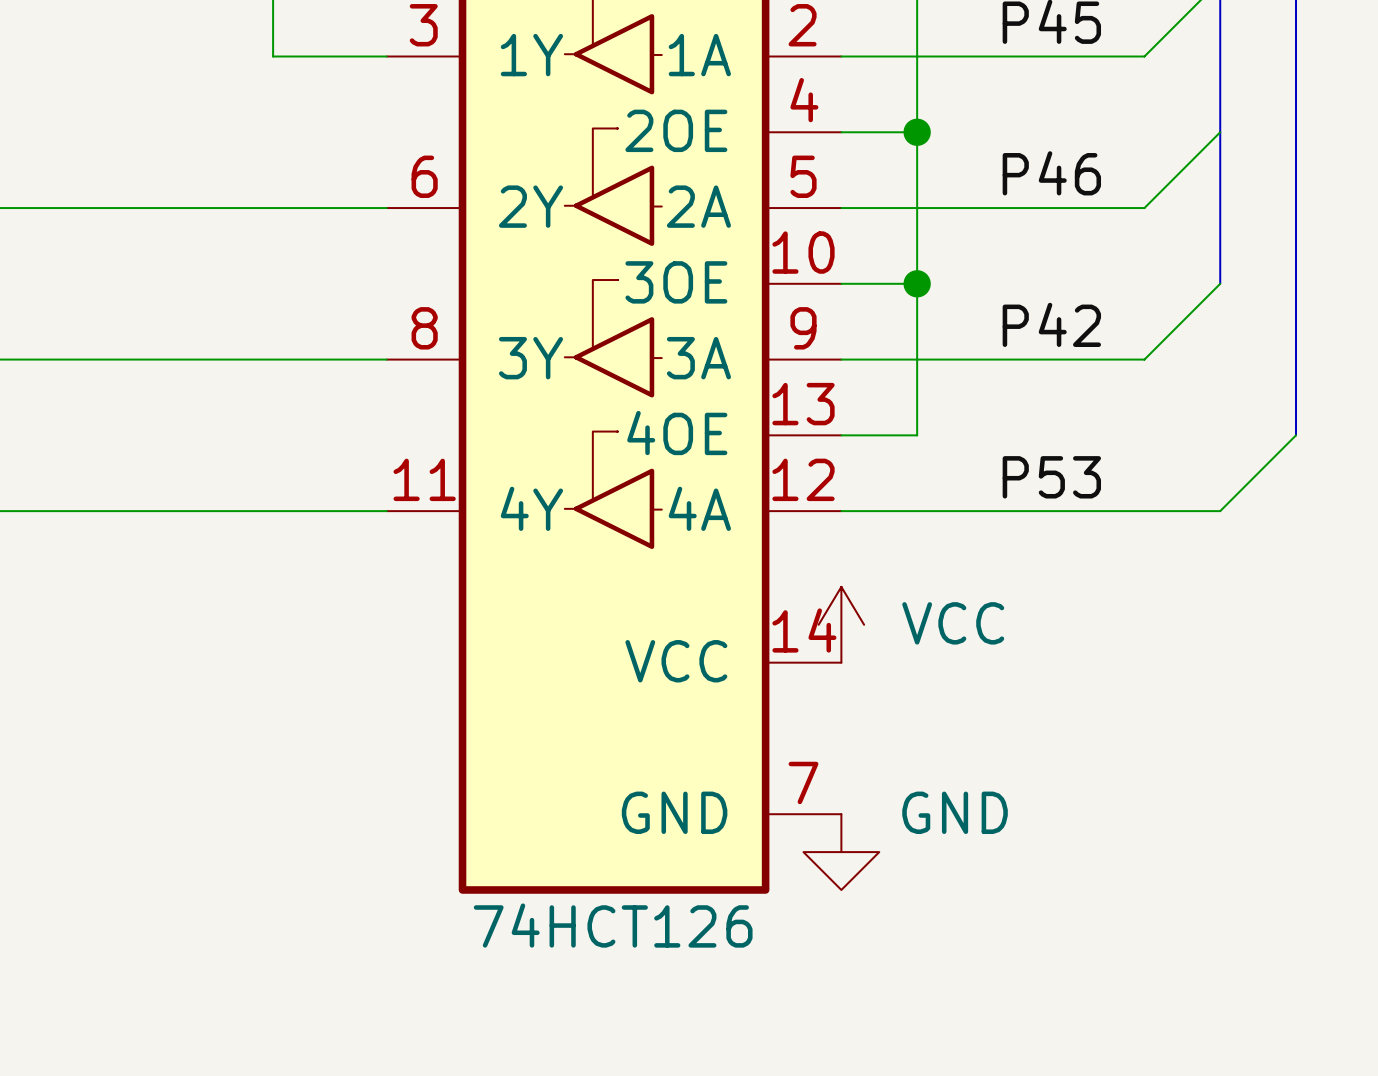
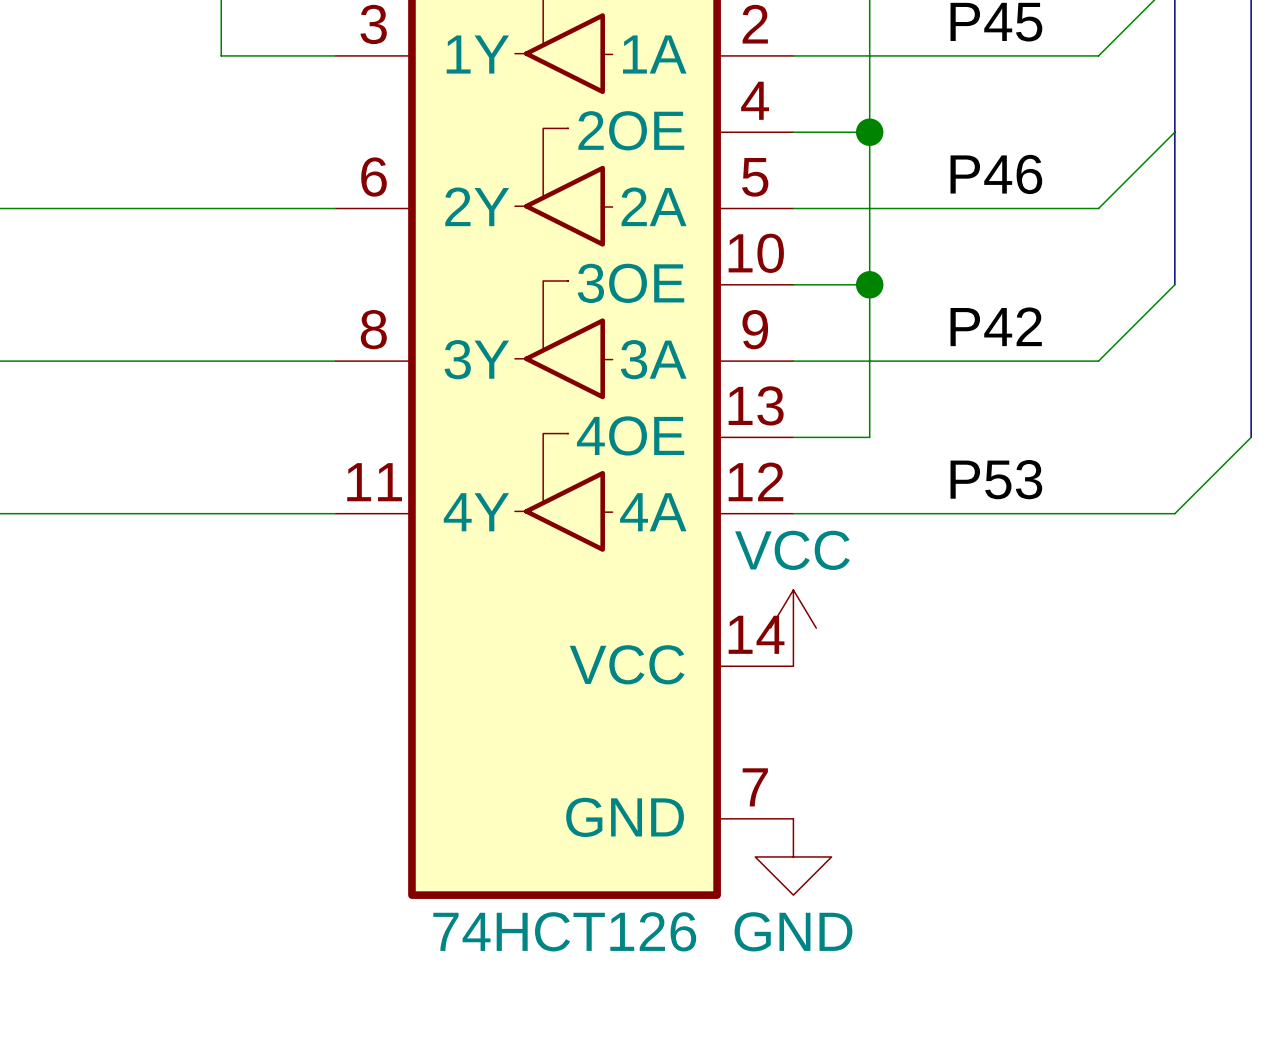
power symbol text position: VCC (953, 623) -> VCC (792, 550)
power symbol text position: GND (955, 812) -> GND (793, 931)

